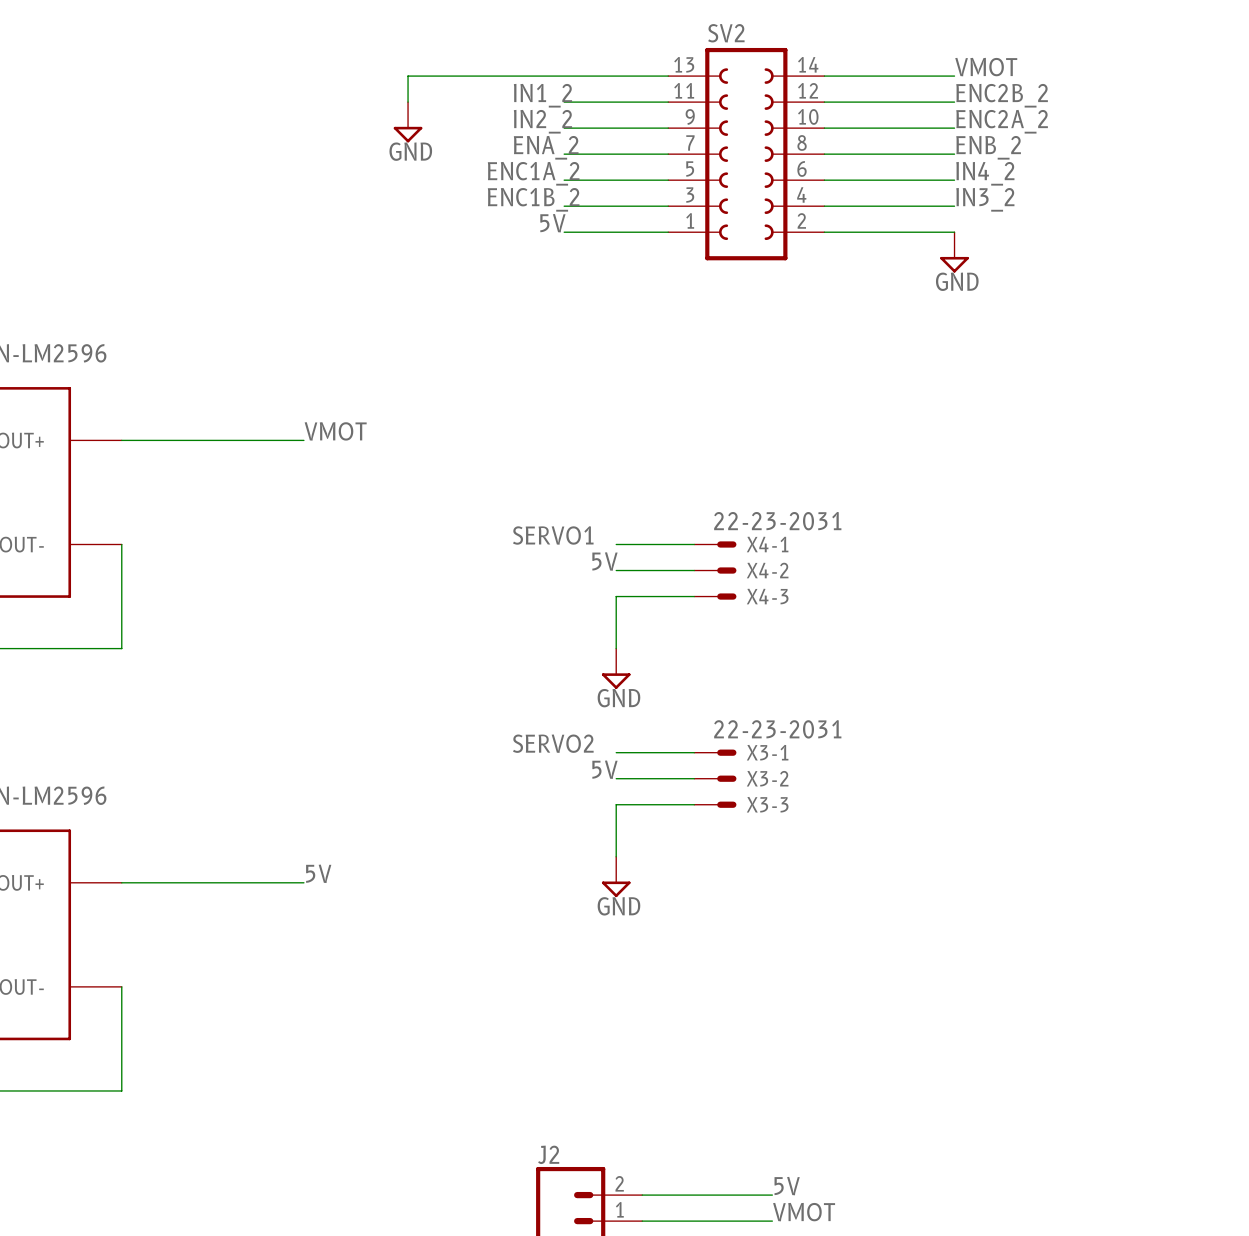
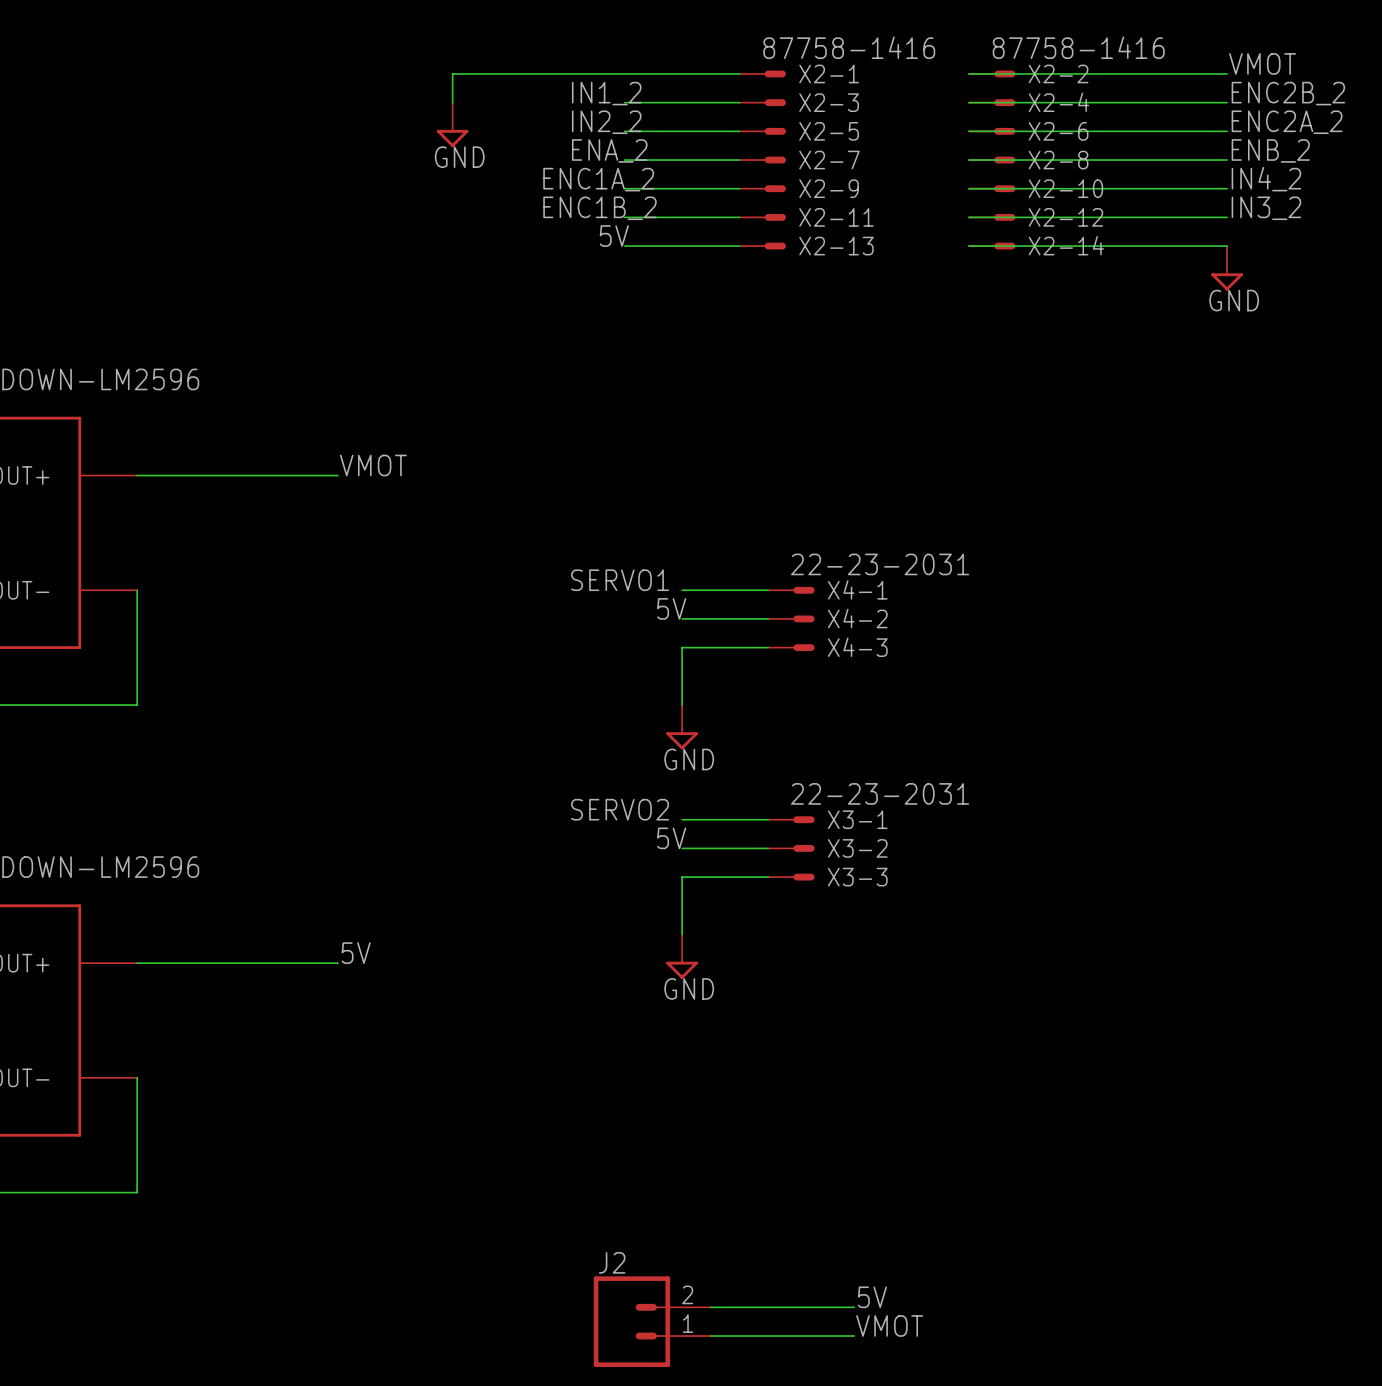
label position: VMOT (986, 67) -> VMOT (1262, 63)
X2-1: none -> 87758-1416 (762, 73)
wire: (824, 76) (876, 76) -> none
X2-2: none -> 87758-1416 (992, 73)
wire: none -> (1054, 73) (1227, 73)
label position: ENC2B_2 (1002, 95) -> ENC2B_2 (1288, 93)
X2-3: none -> (762, 102)
wire: (824, 102) (876, 102) -> none
X2-4: none -> (992, 102)
wire: none -> (1054, 102) (1227, 102)
label position: ENC2A_2 (1002, 121) -> ENC2A_2 (1287, 122)
X2-5: none -> (762, 131)
wire: (824, 128) (876, 128) -> none
X2-6: none -> (992, 131)
wire: none -> (1054, 131) (1227, 131)
label position: ENB_2 (988, 147) -> ENB_2 (1270, 150)
X2-7: none -> (762, 160)
SV2: (746, 154) -> none
wire: (824, 154) (876, 154) -> none
X2-8: none -> (992, 160)
wire: none -> (1054, 160) (1227, 160)
label position: IN4_2 (985, 173) -> IN4_2 (1266, 179)
X2-9: none -> (762, 188)
wire: (824, 180) (876, 180) -> none
X2-10: none -> (992, 188)
wire: none -> (1054, 188) (1227, 188)
label position: IN3_2 (985, 199) -> IN3_2 (1266, 208)
X2-11: none -> (762, 217)
wire: (824, 206) (876, 206) -> none
X2-12: none -> (992, 217)
wire: none -> (1054, 217) (1227, 217)
X2-13: none -> (762, 246)
wire: (824, 232) (876, 232) -> none
X2-14: none -> (992, 246)
wire: none -> (1054, 246) (1227, 246)
power symbol position: GND (954, 252) -> GND (1227, 268)

